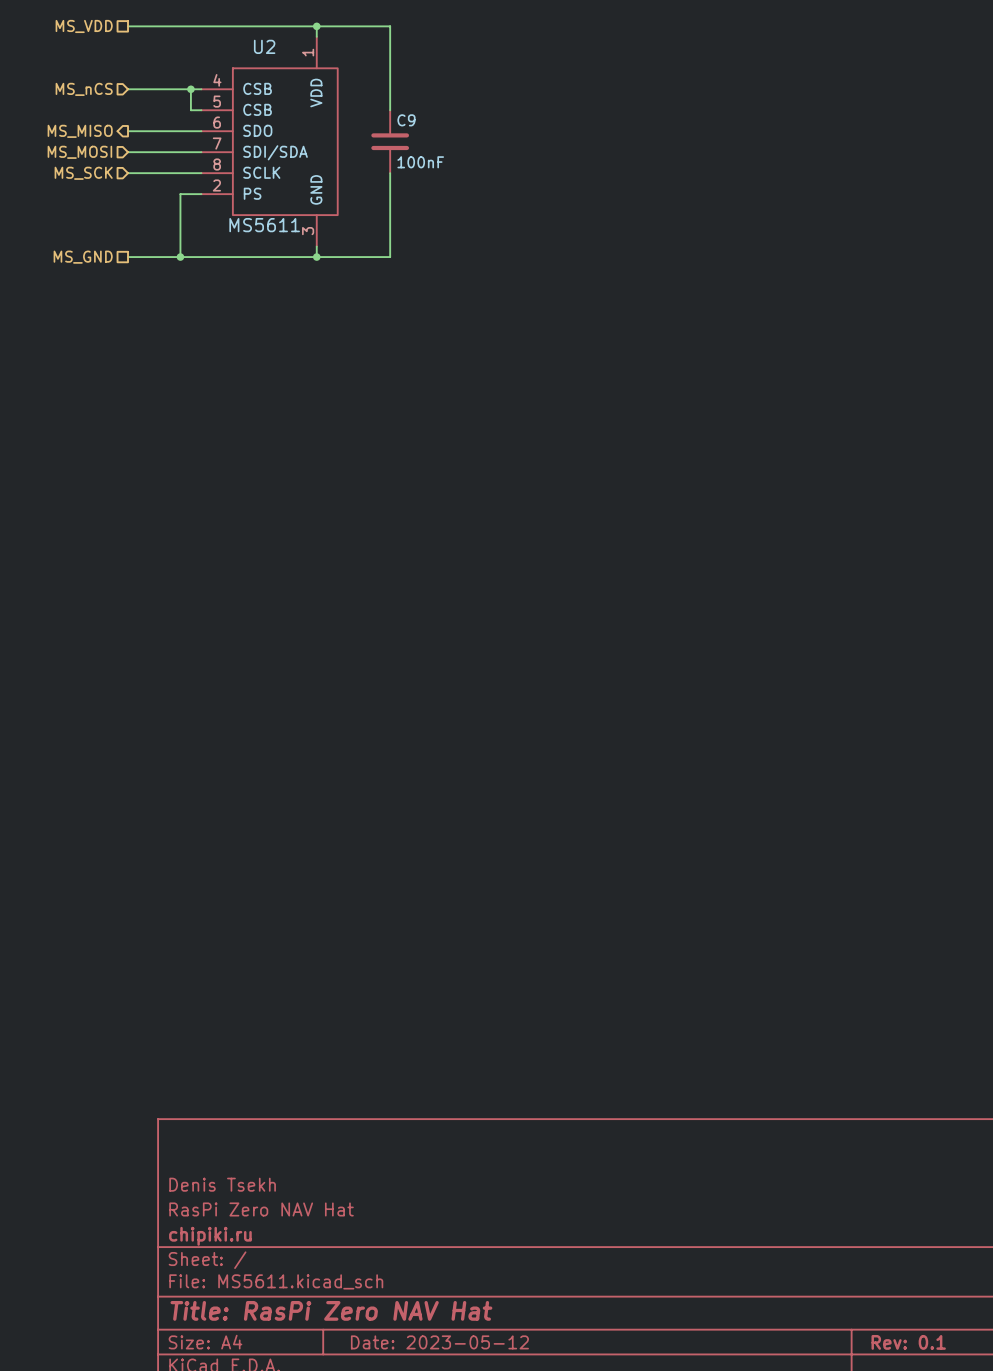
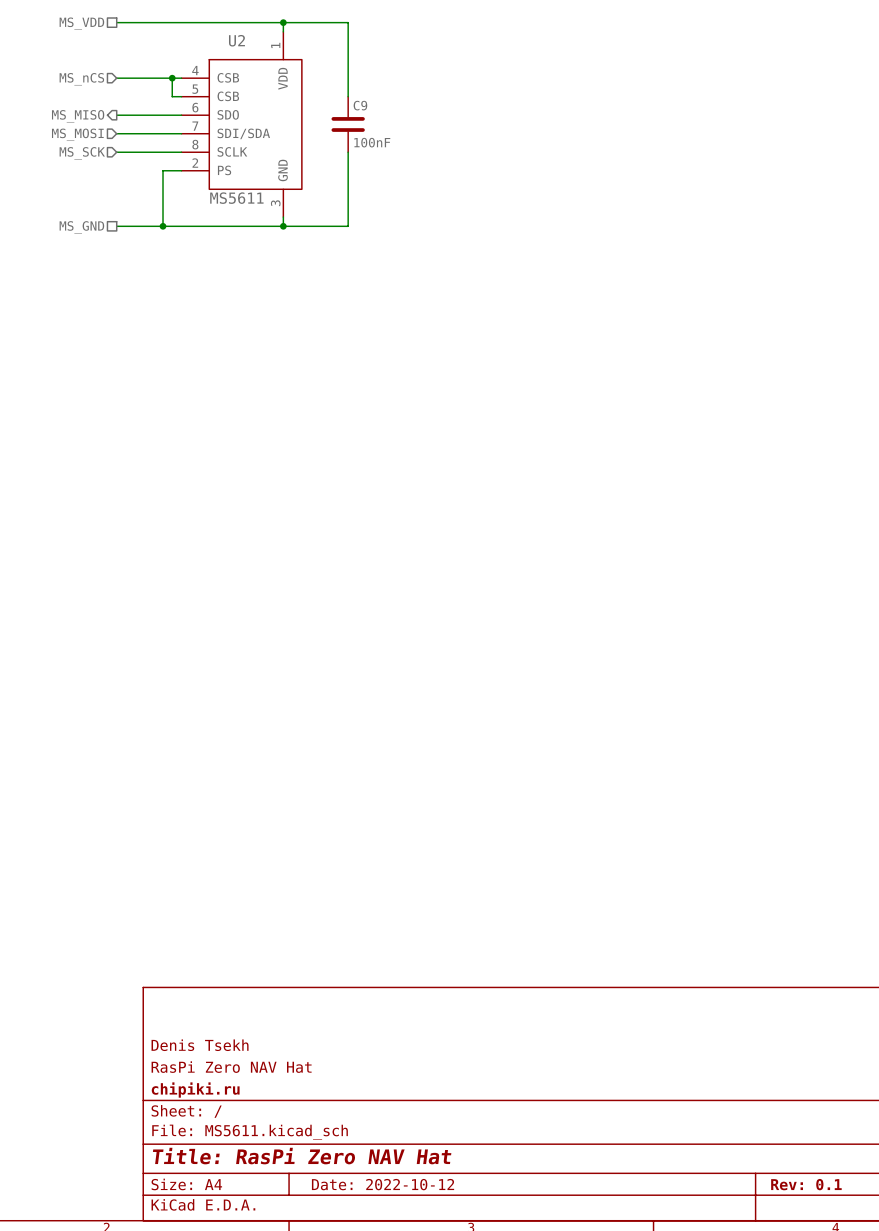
title block: Date: 2023-05-12 (439, 1342) -> Date: 2022-10-12 (383, 1184)

